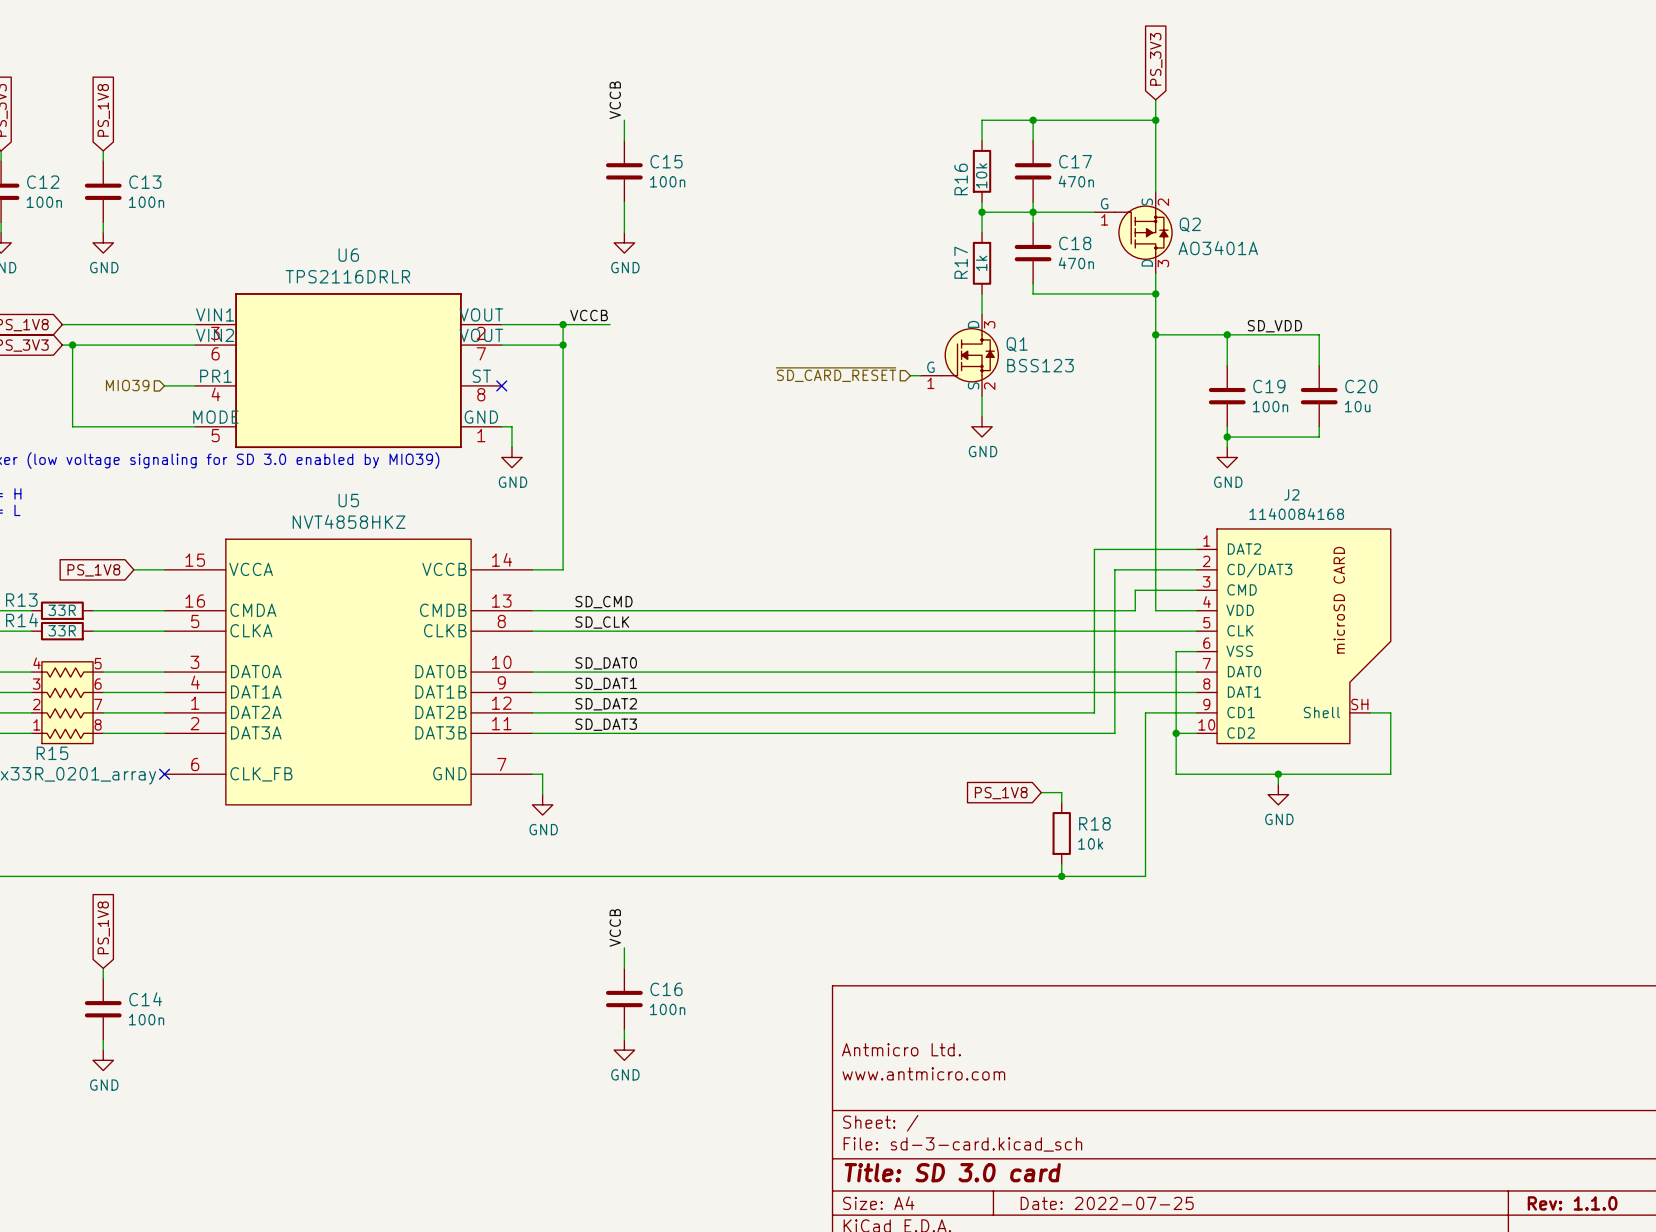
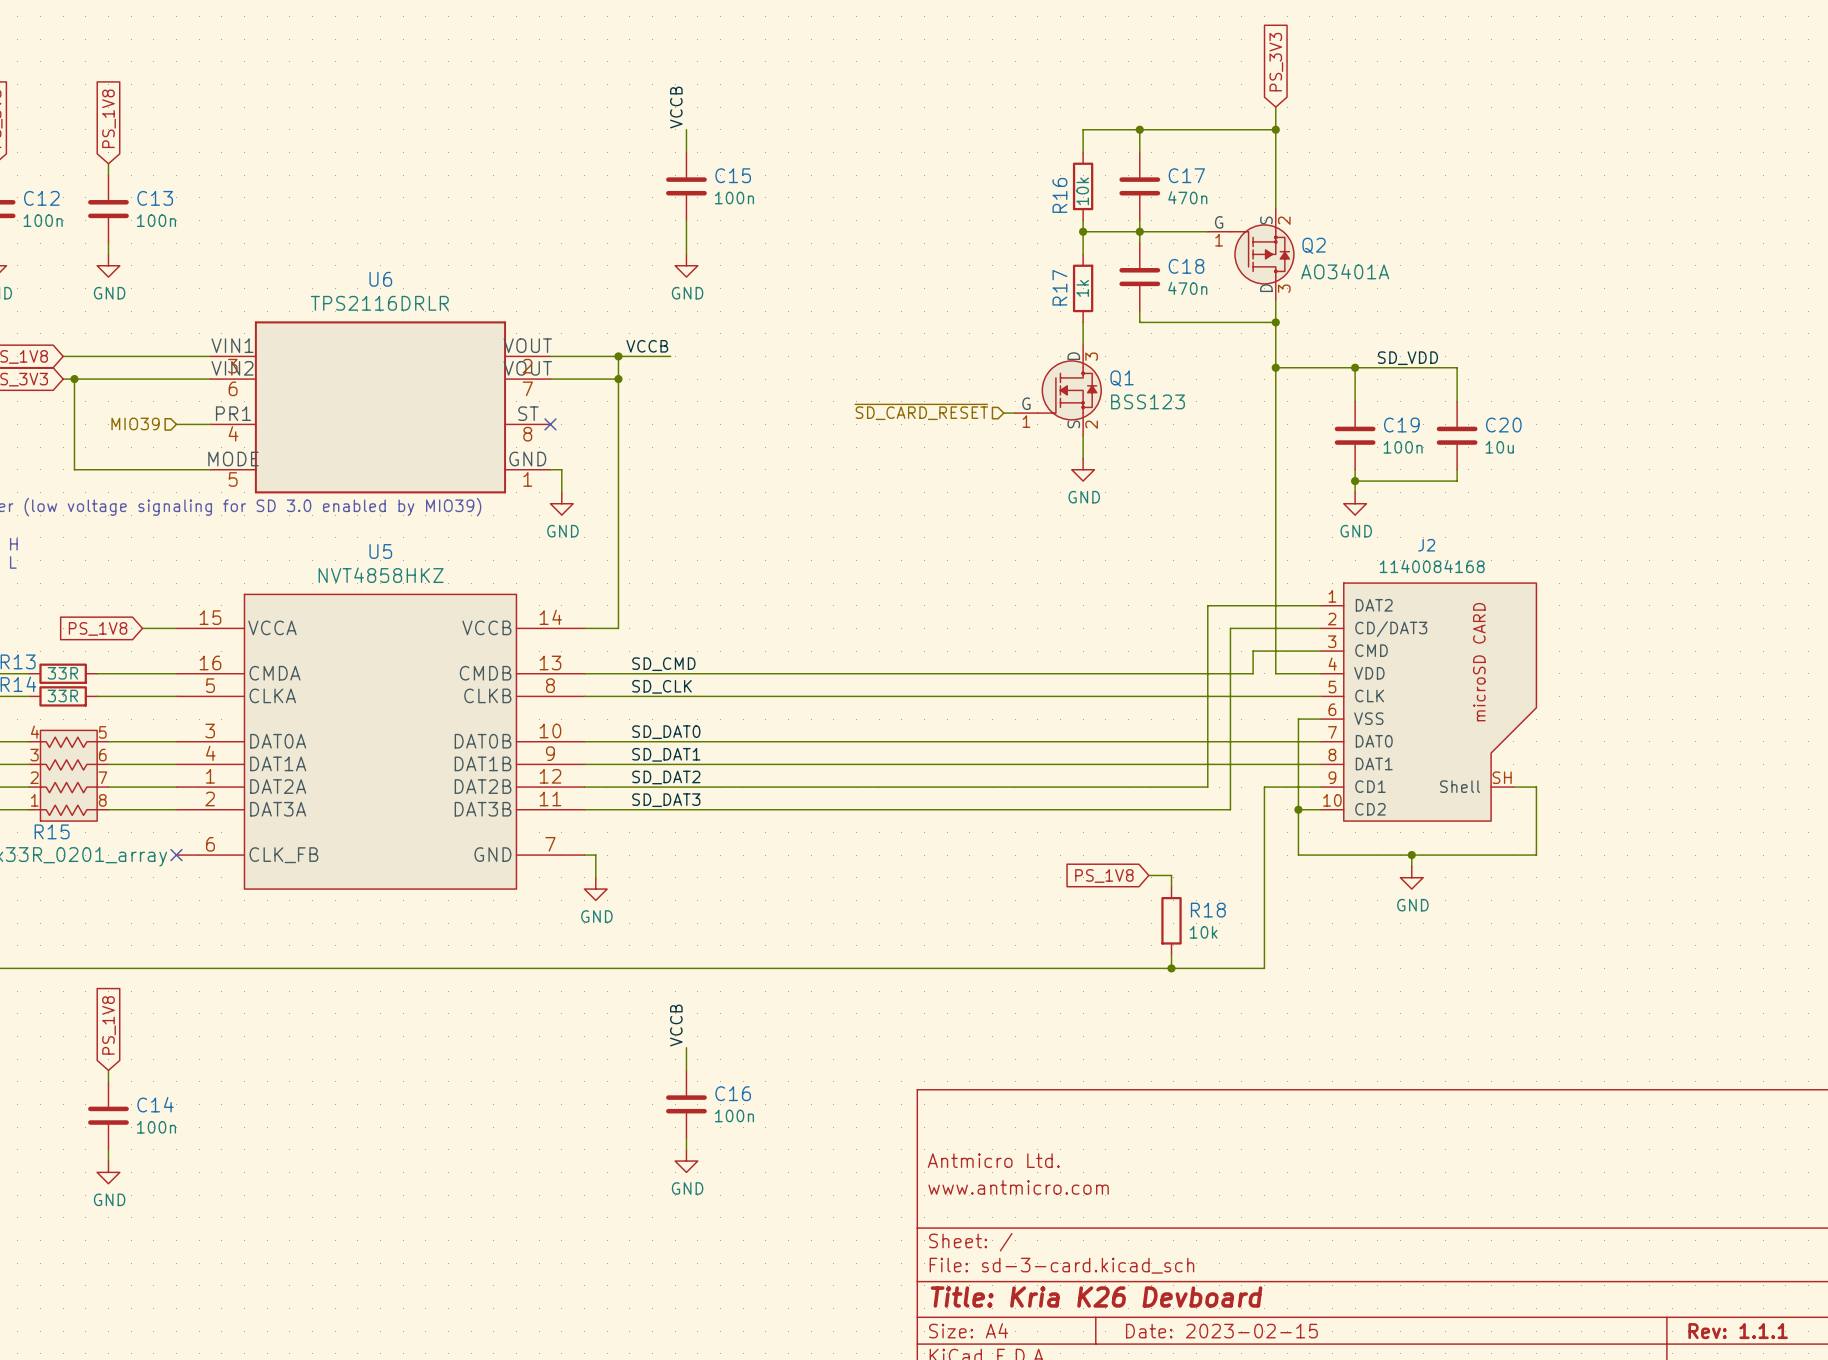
title block: Title: SD 3.0 card (952, 1172) -> Title: Kria K26 Devboard (1096, 1297)
title block: Date: 2022-07-25 (1107, 1203) -> Date: 2023-02-15 (1221, 1331)
title block: Rev: 1.1.0 (1572, 1203) -> Rev: 1.1.1 (1738, 1331)

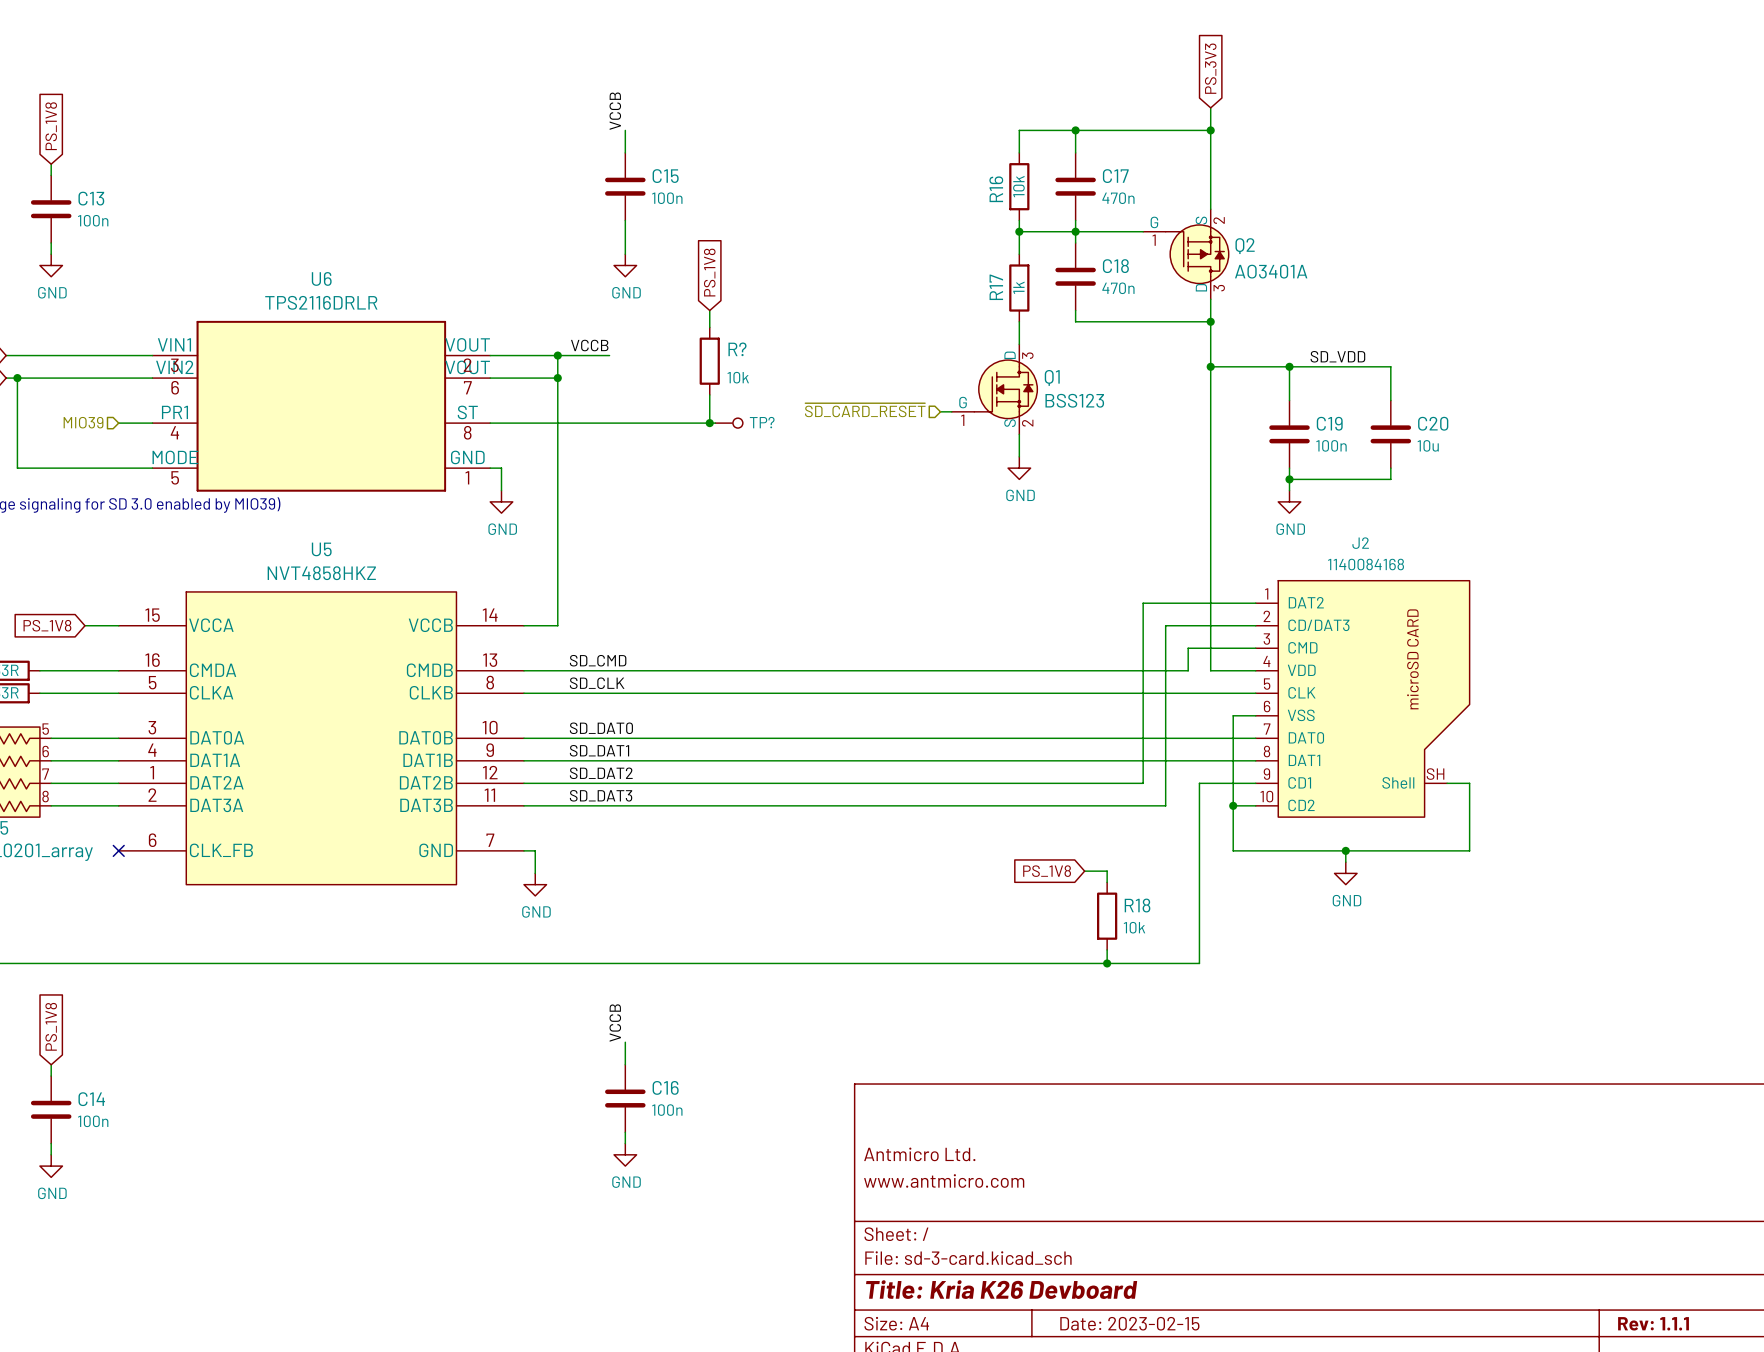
global label: none -> PS_1V8 (709, 272)
wire: none -> (709, 310) (709, 327)
R?: none -> (709, 361)
wire: none -> (709, 394) (709, 423)
wire: none -> (490, 423) (715, 423)
no-connect mark: (550, 424) -> none
junction: none -> (709, 423)
TP?: none -> (729, 423)

